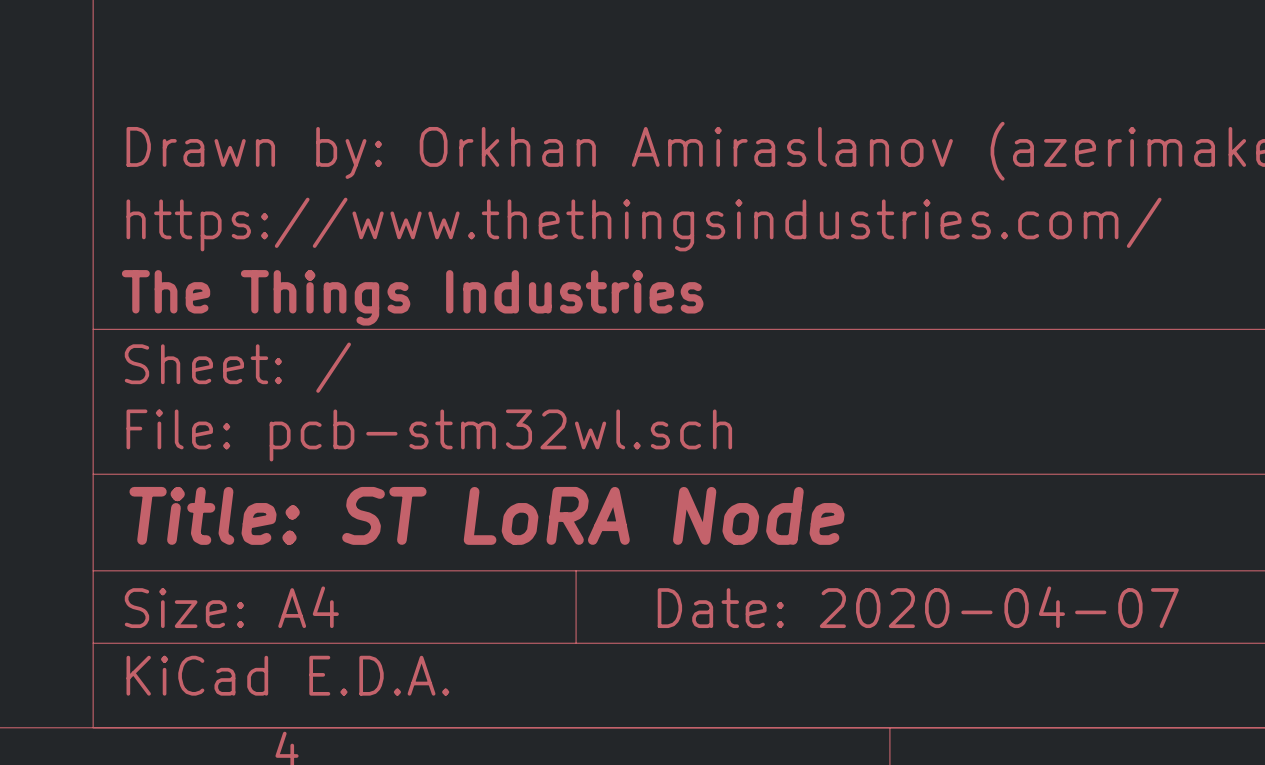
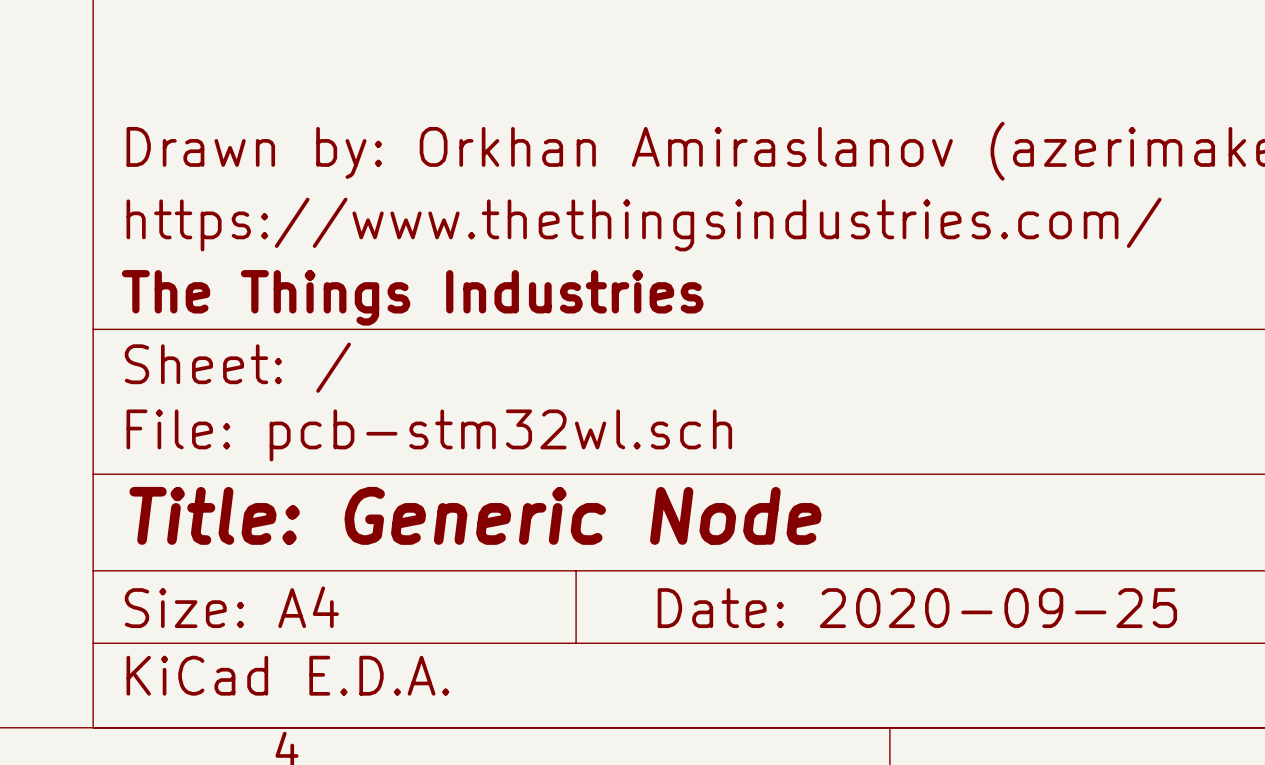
title block: Title: ST LoRA Node (486, 515) -> Title: Generic Node (475, 515)
title block: Date: 2020-04-07 (918, 607) -> Date: 2020-09-25 (917, 608)

